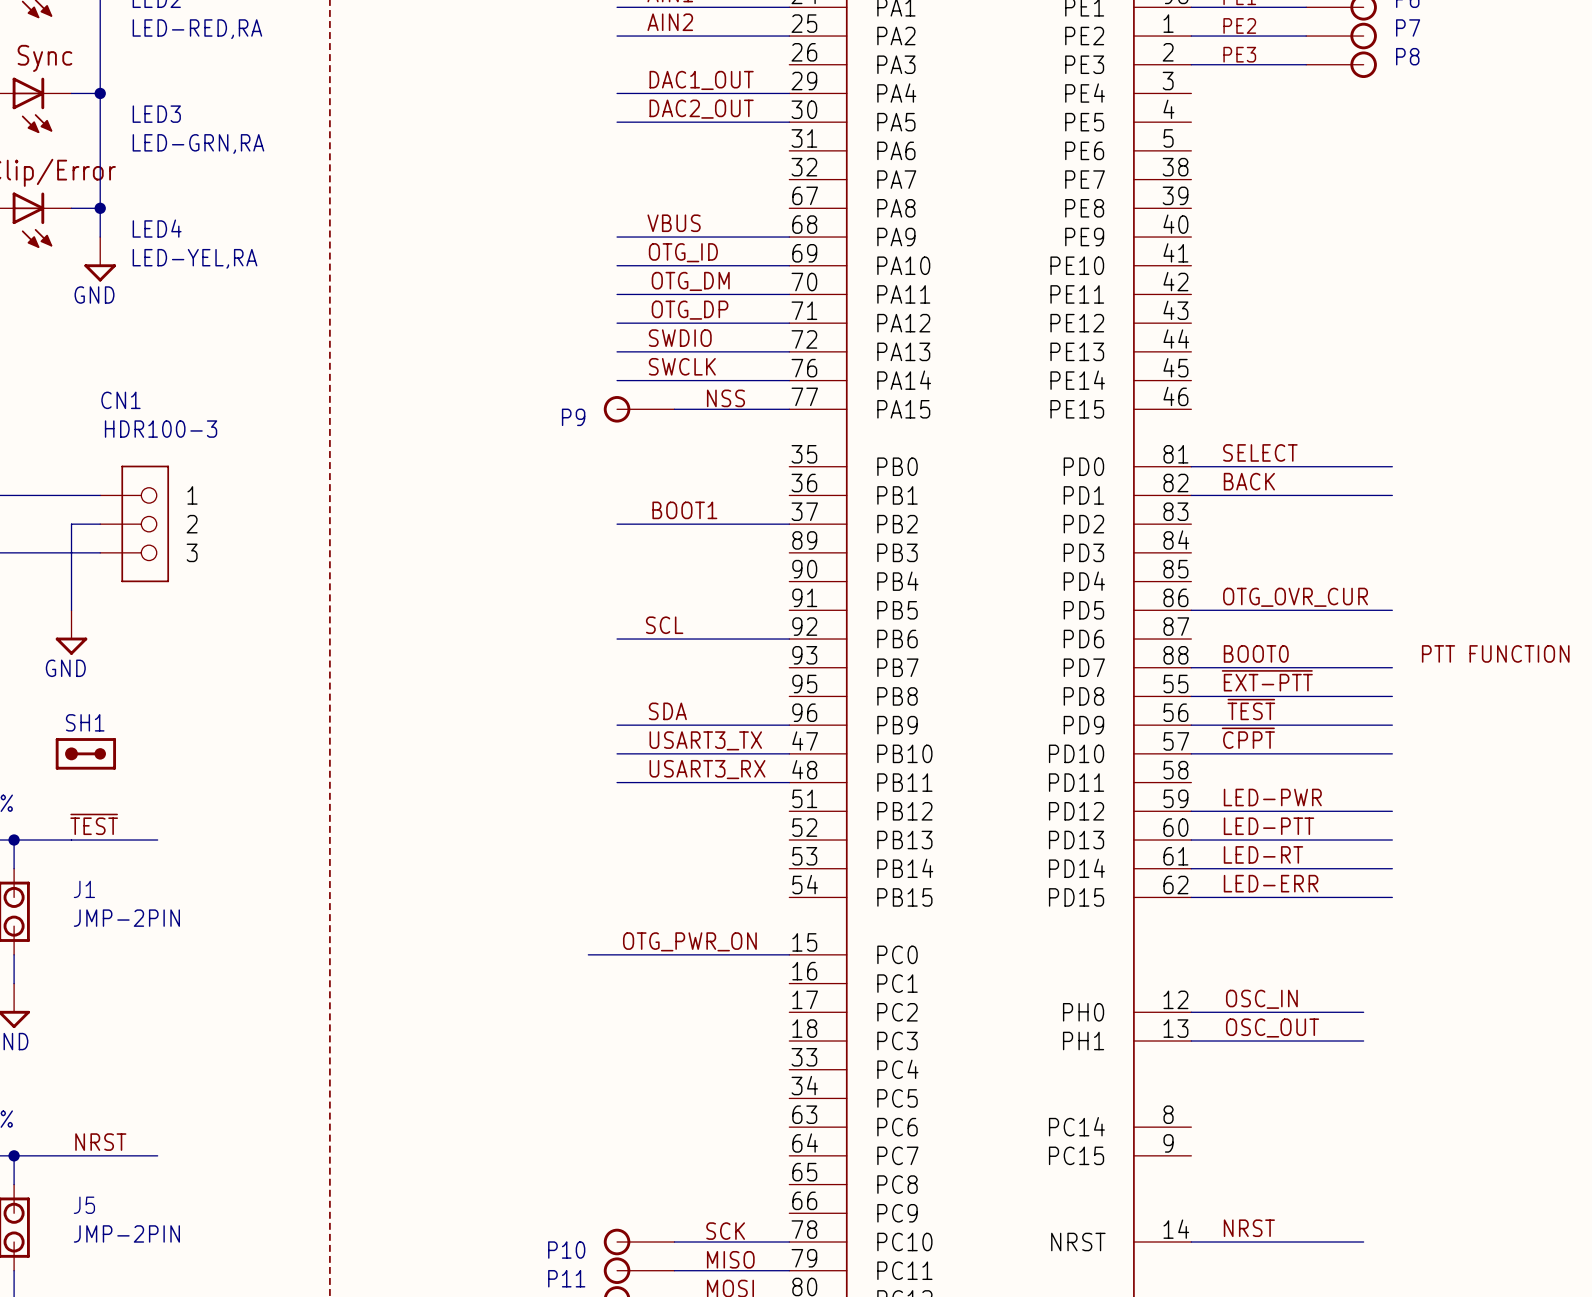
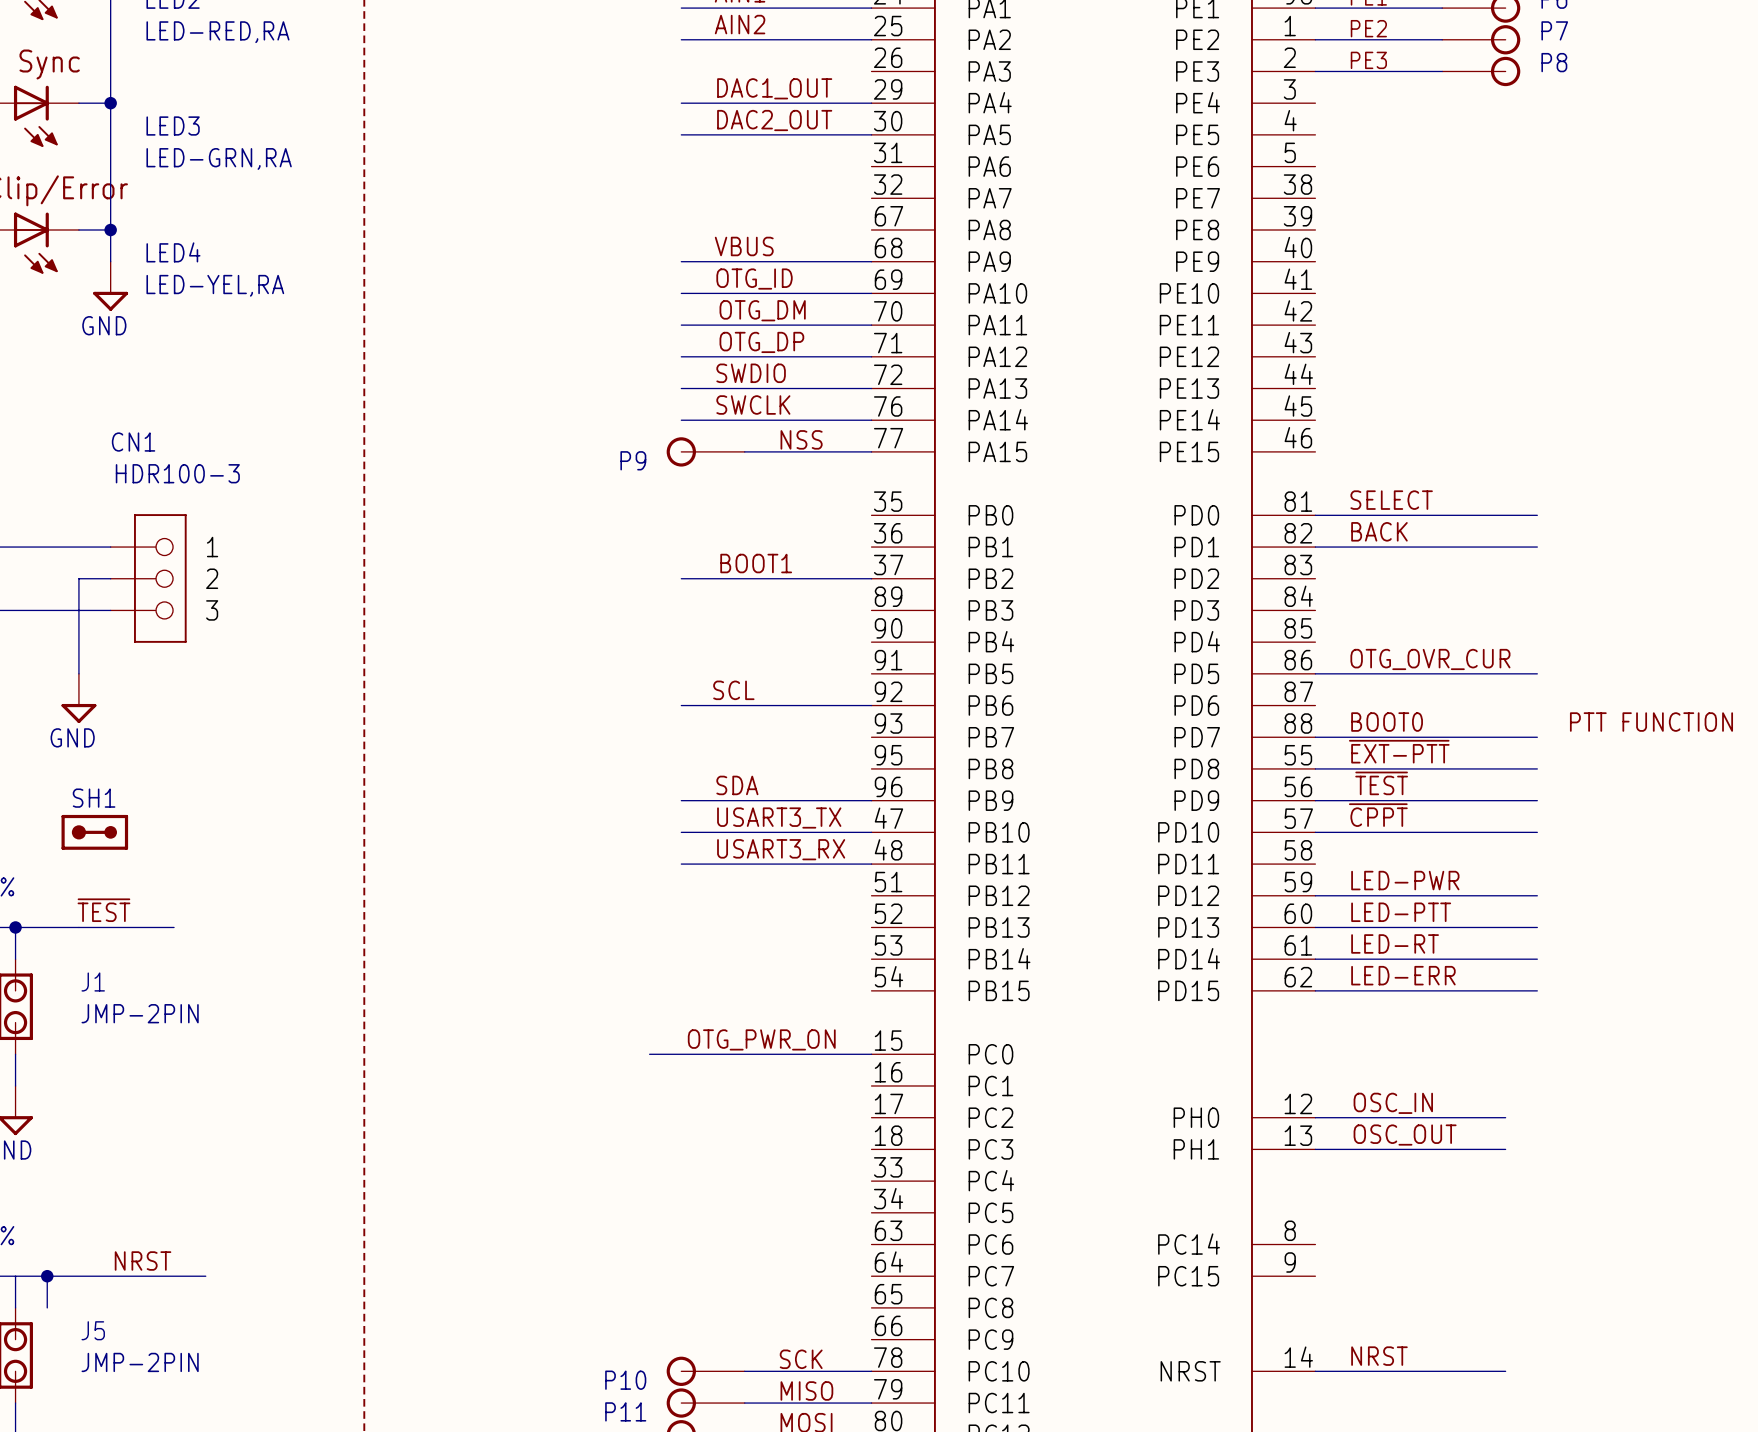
label position: NRST (100, 1142) -> NRST (143, 1261)
junction: (14, 1155) -> none
wire: none -> (47, 1276) (47, 1307)
junction: none -> (47, 1276)
wire: none -> (174, 1276) (205, 1276)

